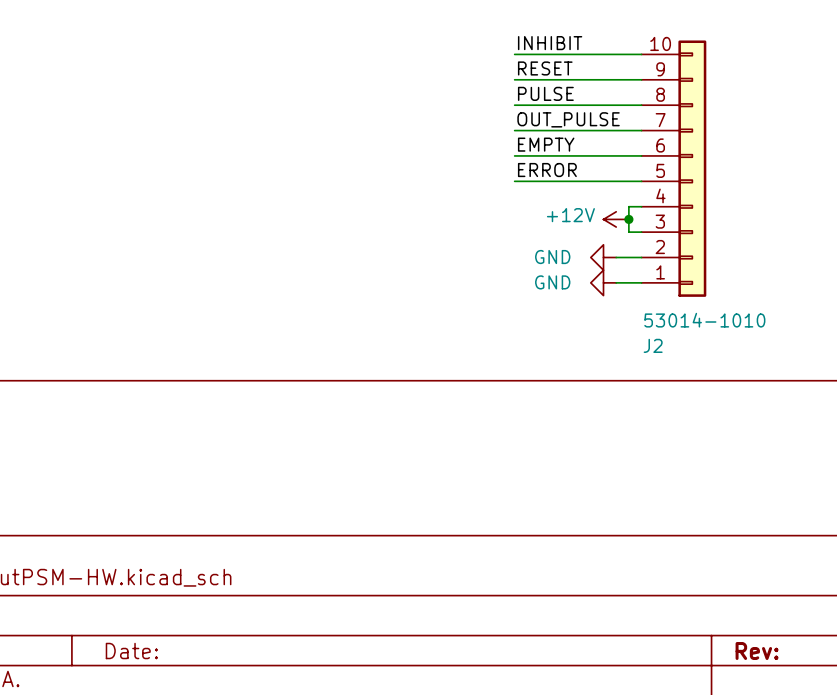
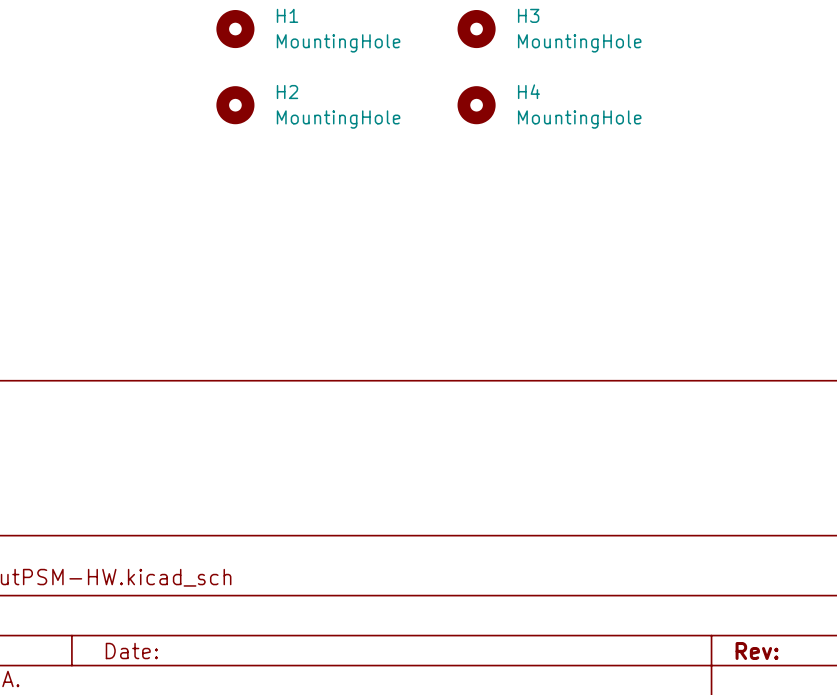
H1: none -> MountingHole (235, 29)
H3: none -> MountingHole (476, 29)
label: INHIBIT (550, 43) -> none
wire: (514, 54) (641, 54) -> none
label: RESET (545, 68) -> none
wire: (514, 79) (641, 79) -> none
label: PULSE (545, 93) -> none
H2: none -> MountingHole (235, 105)
H4: none -> MountingHole (476, 105)
wire: (514, 105) (641, 105) -> none
label: OUT_PULSE (568, 119) -> none
wire: (514, 130) (641, 130) -> none
label: EMPTY (546, 144) -> none
wire: (514, 155) (641, 155) -> none
J2: 53014-1010 (673, 168) -> none
label: ERROR (547, 170) -> none
wire: (514, 181) (641, 181) -> none
wire: (641, 206) (628, 206) (628, 232) (641, 232) -> none
power symbol: +12V (616, 219) -> none
junction: (628, 219) -> none
power symbol: GND (603, 257) -> none
wire: (616, 257) (641, 257) -> none
power symbol: GND (603, 282) -> none
wire: (616, 282) (641, 282) -> none

